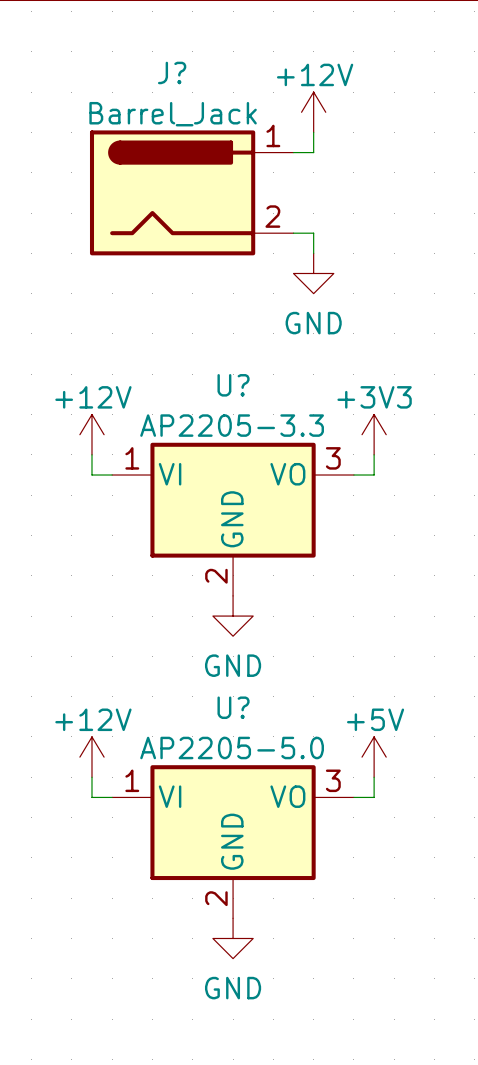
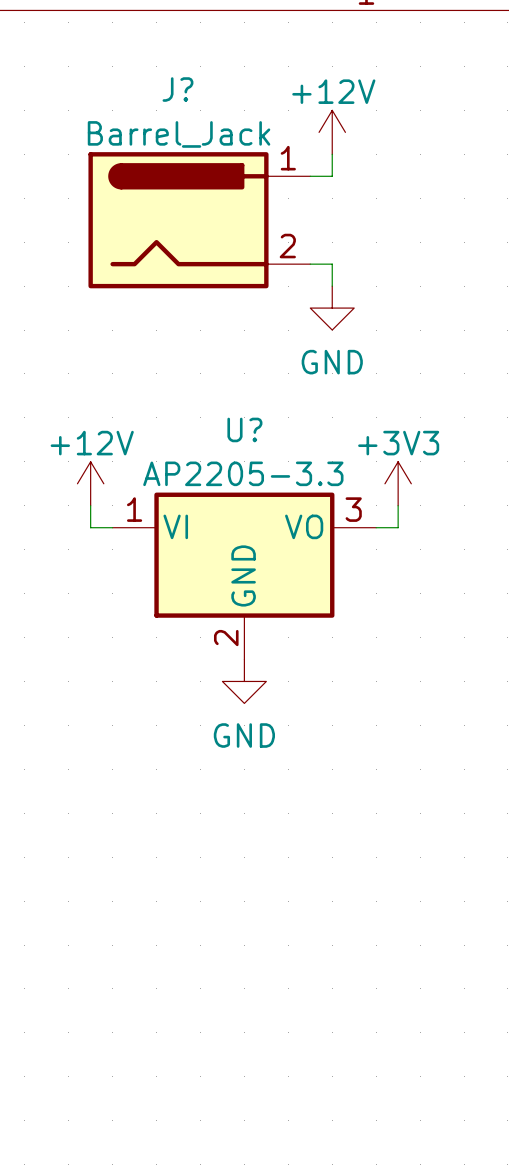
power symbol: +12V (91, 757) -> none
power symbol: +5V (374, 757) -> none
wire: (91, 777) (91, 797) (112, 797) -> none
wire: (374, 777) (374, 797) (353, 797) -> none
U?: AP2205-5.0 (233, 841) -> none
power symbol: GND (233, 938) -> none

